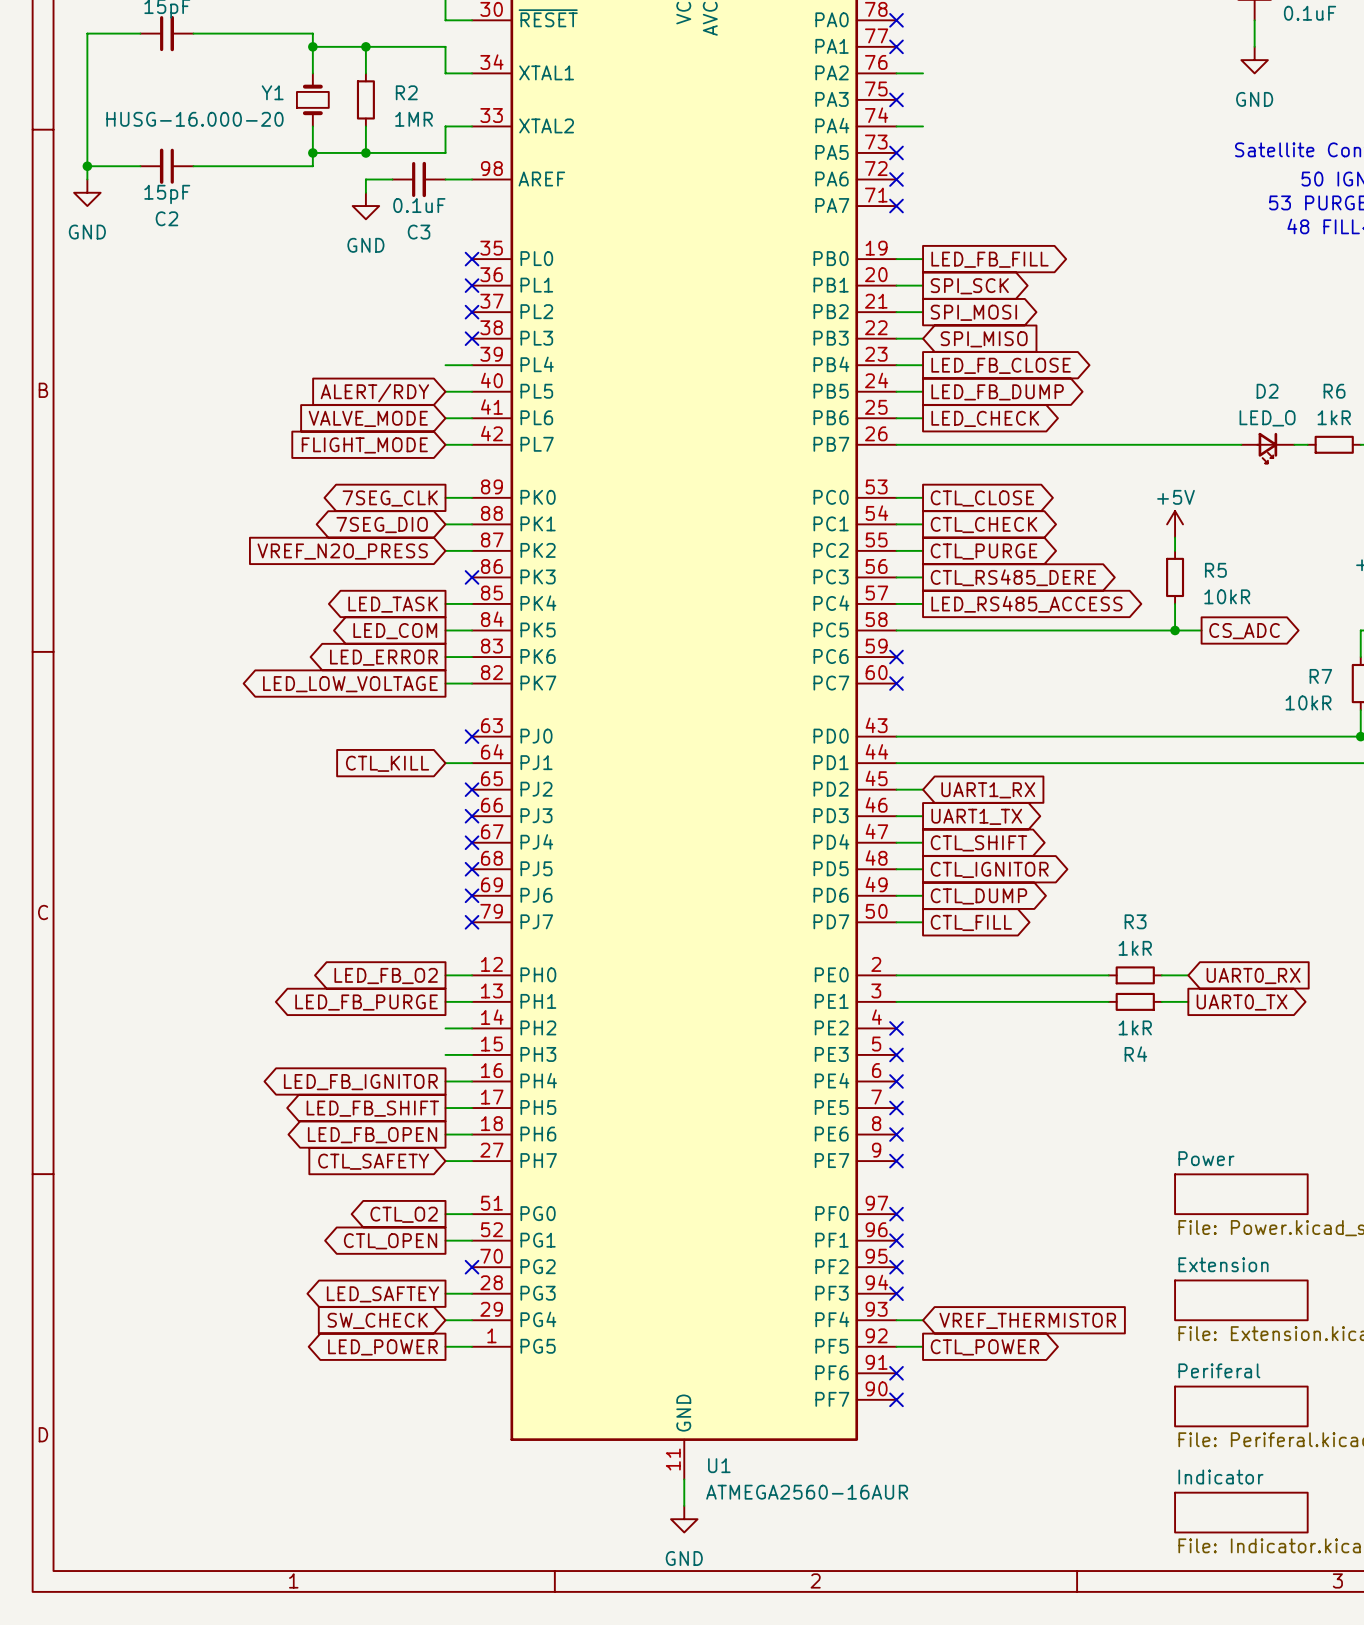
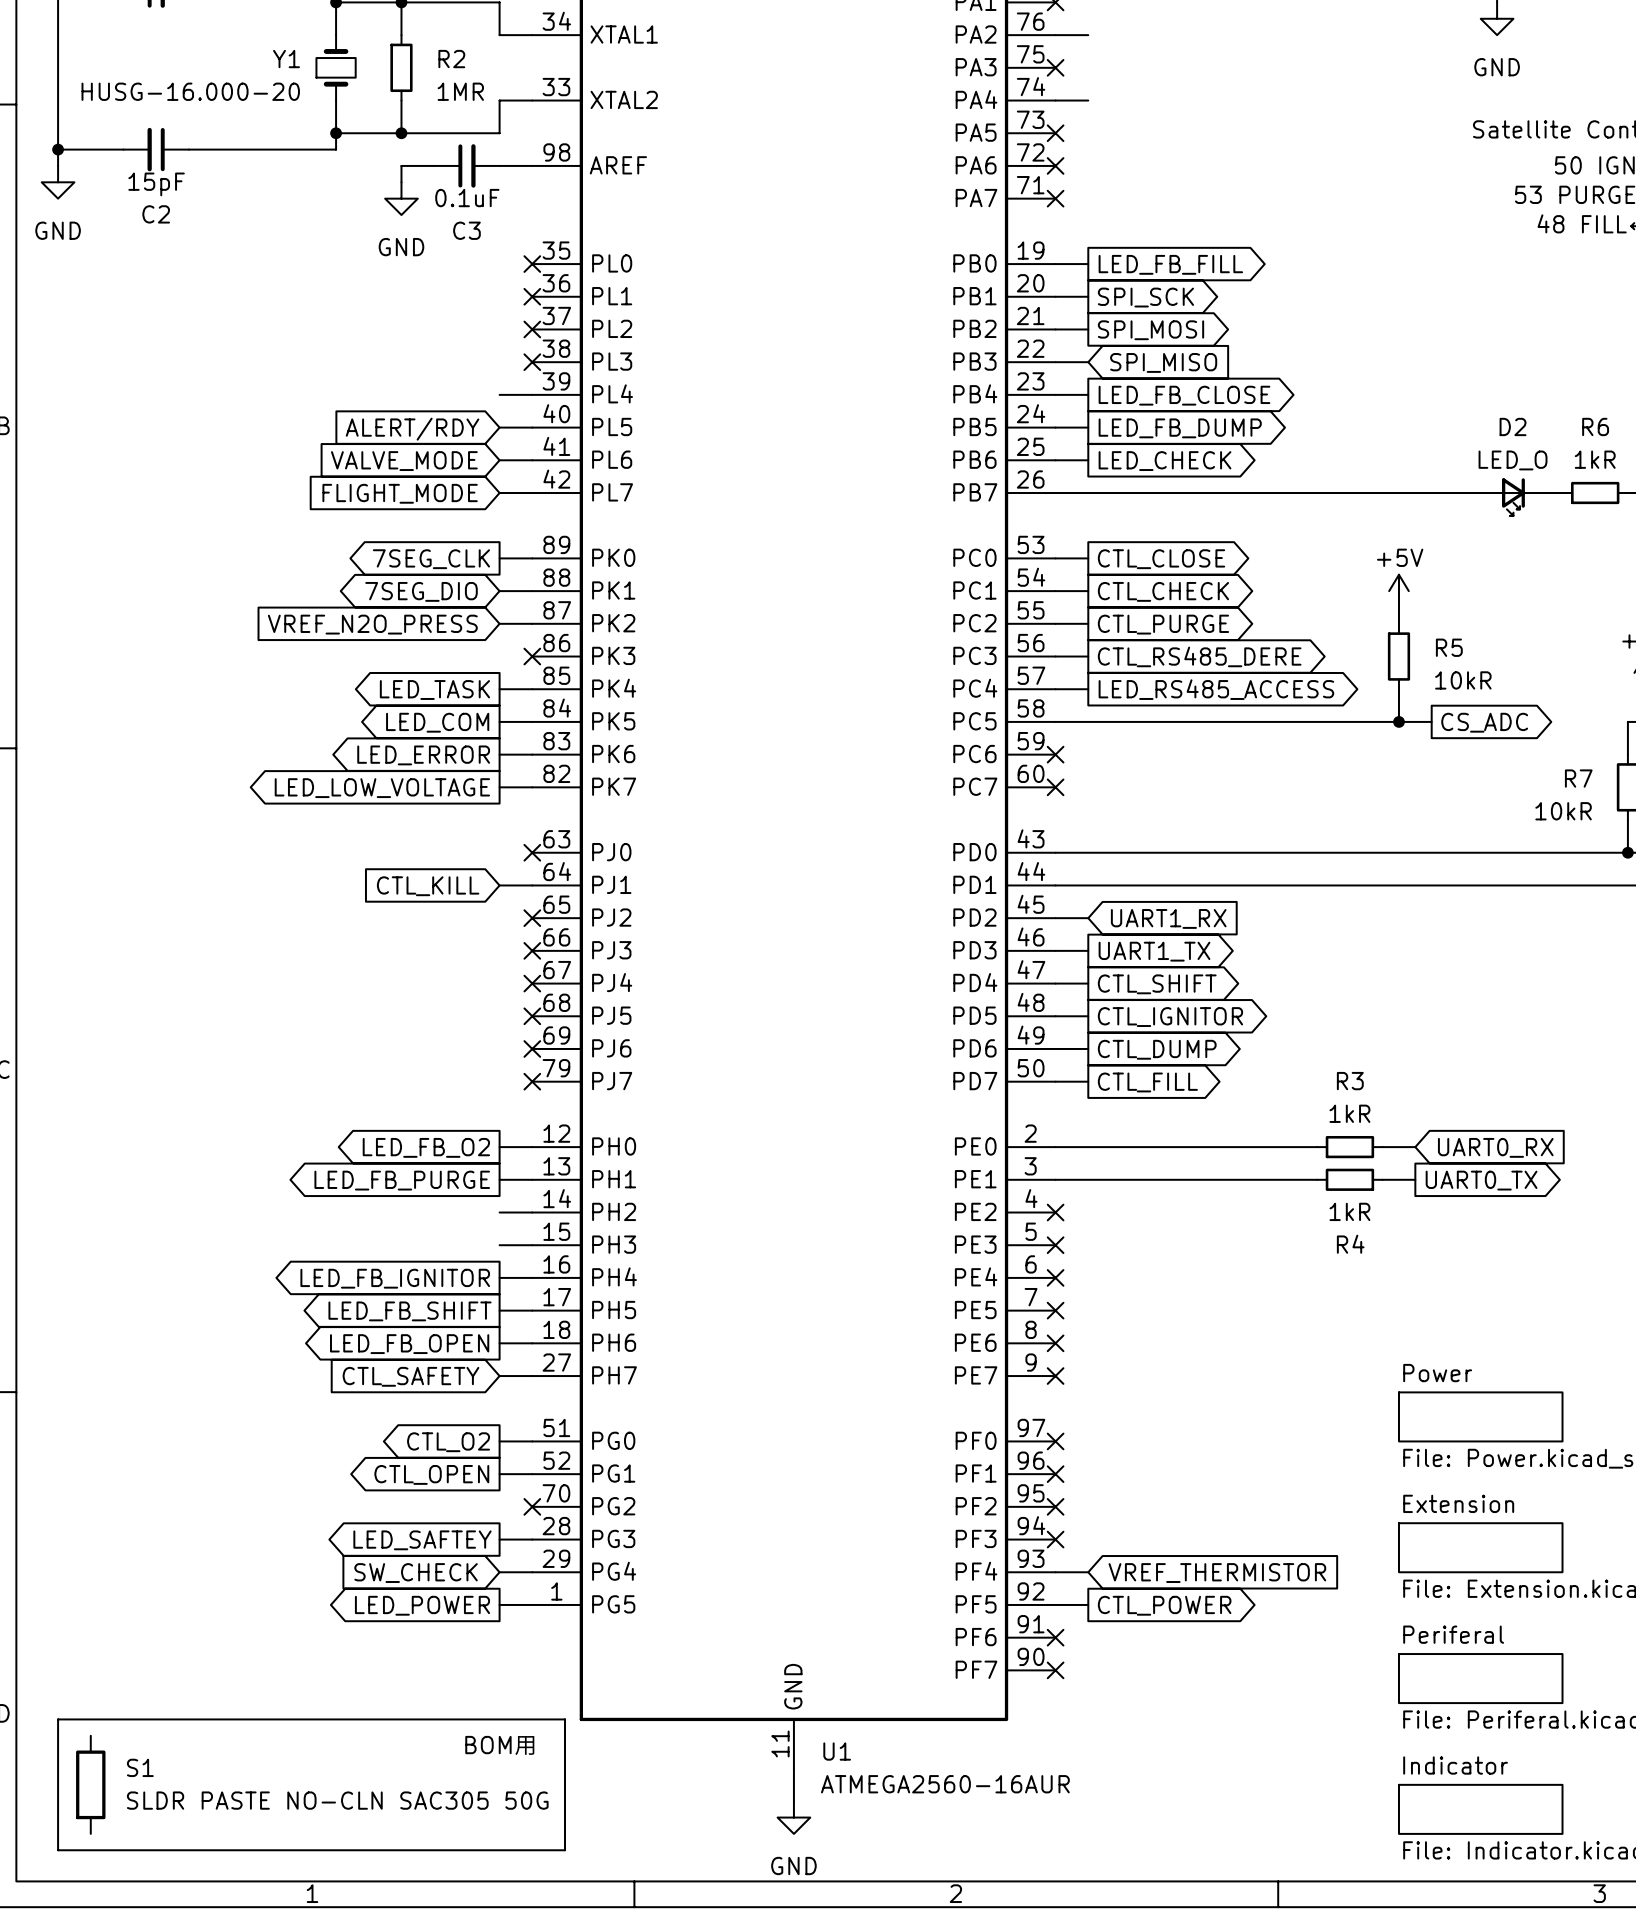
line: none -> (58, 1719) (565, 1719) (565, 1850) (58, 1850) (58, 1719)
text: none -> BOM用 (500, 1745)
S1: none -> SLDR PASTE NO-CLN SAC305 50G (90, 1784)

